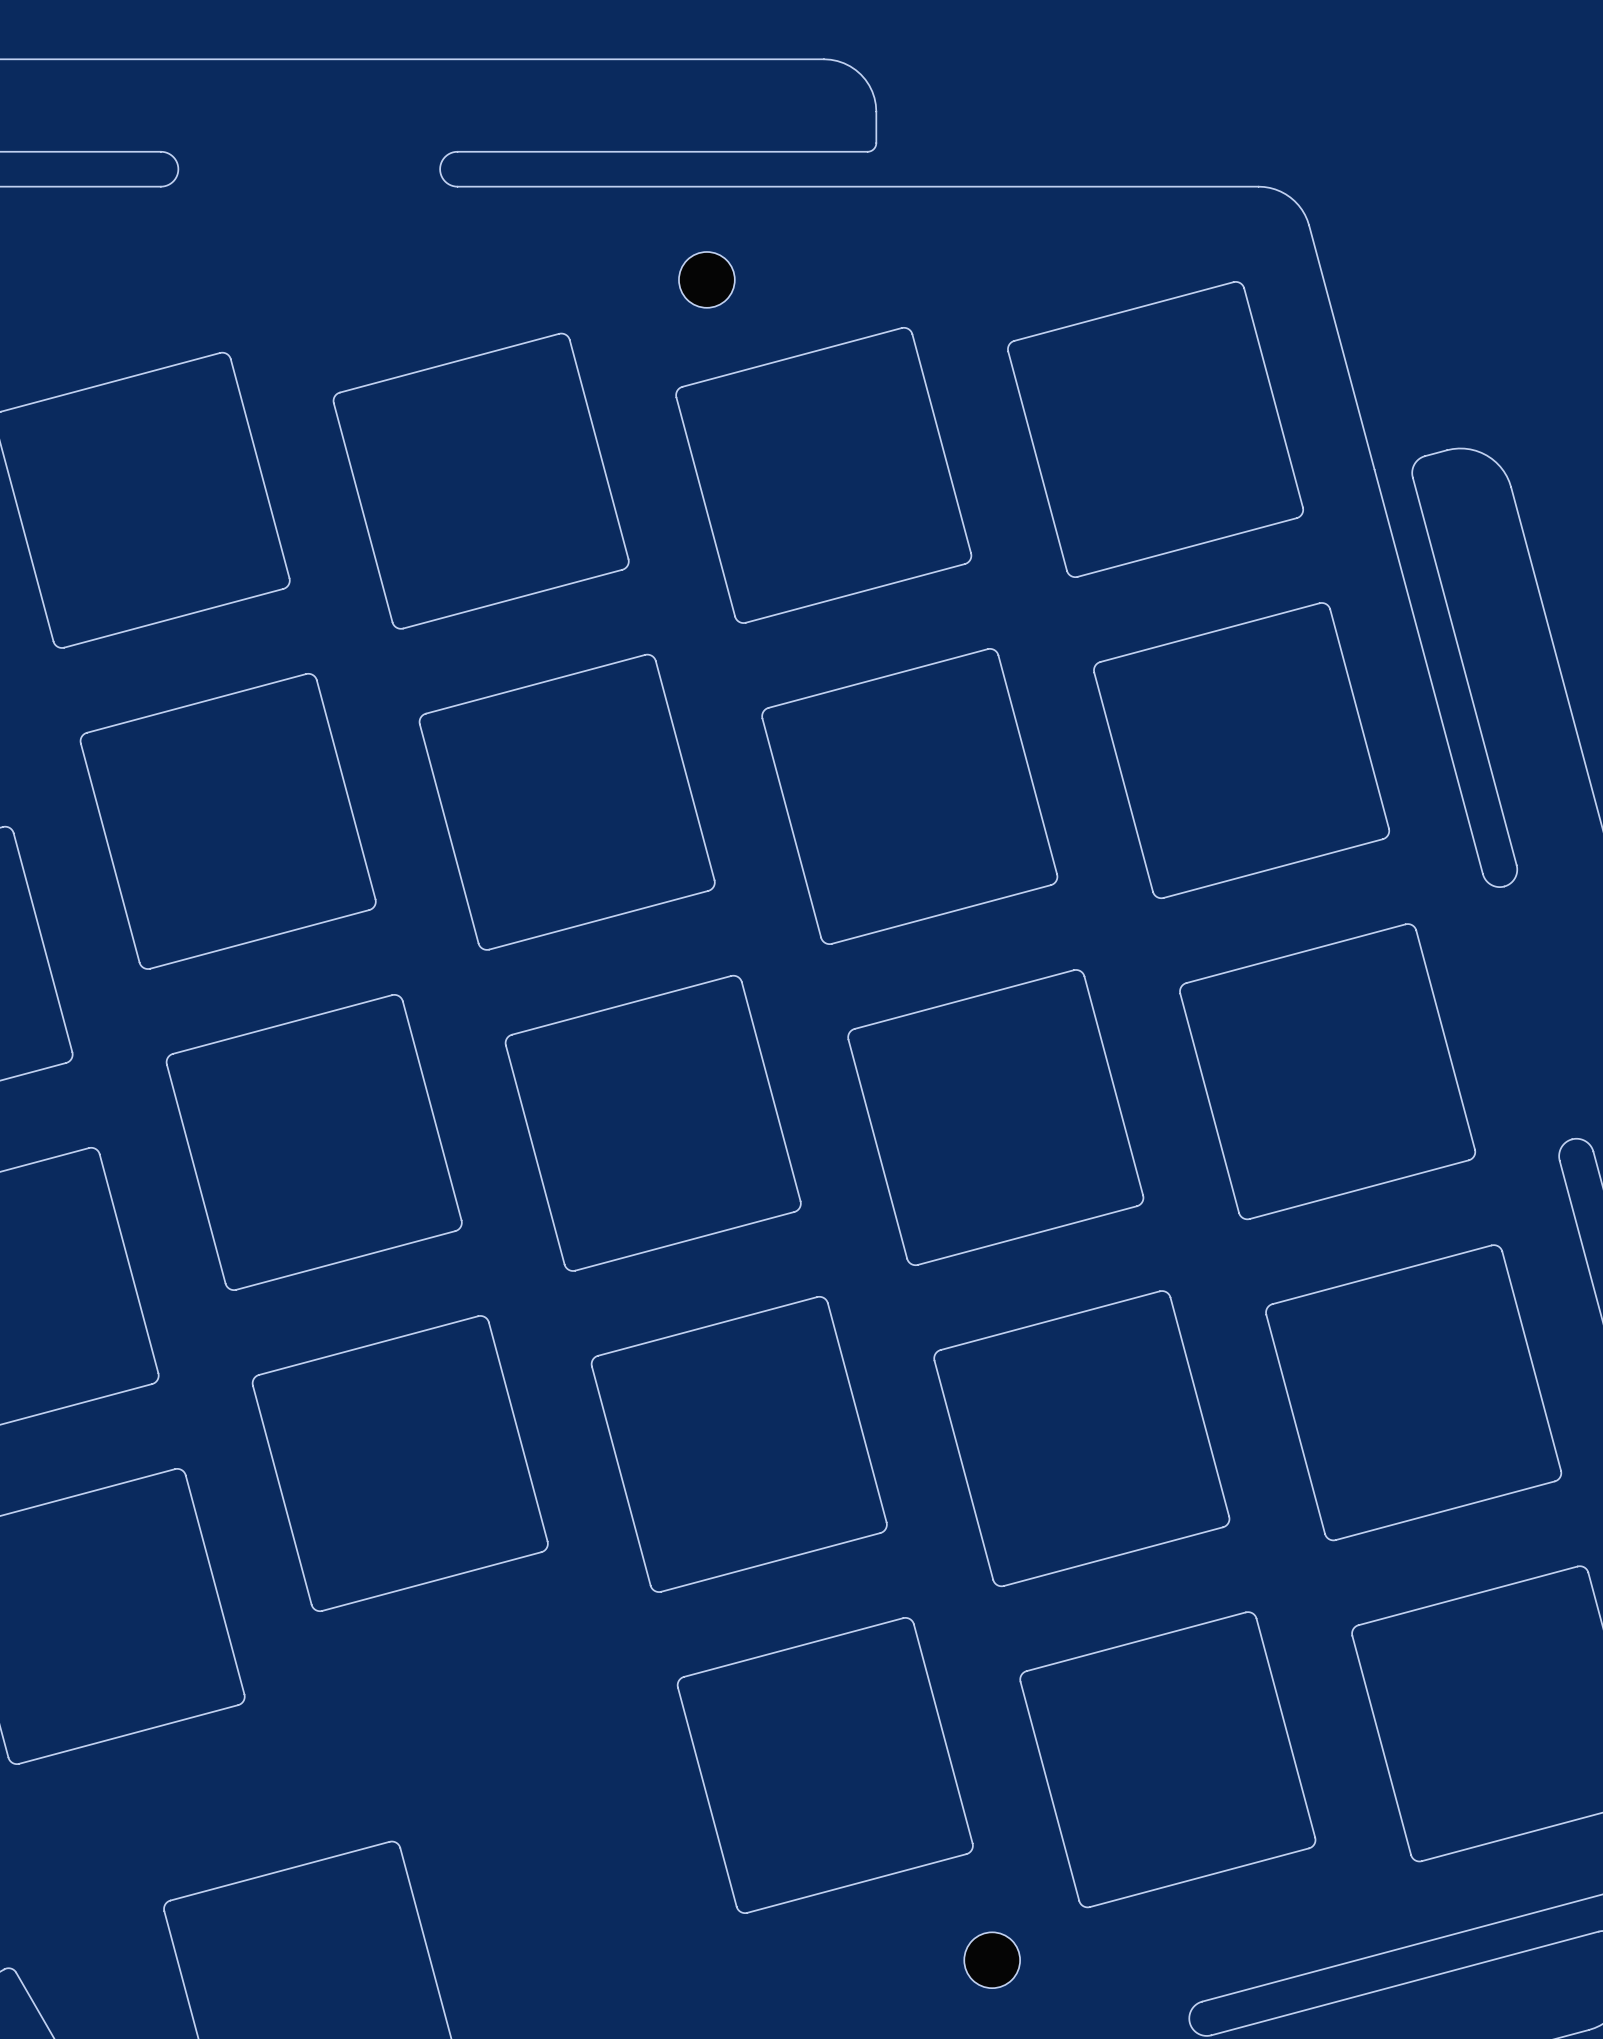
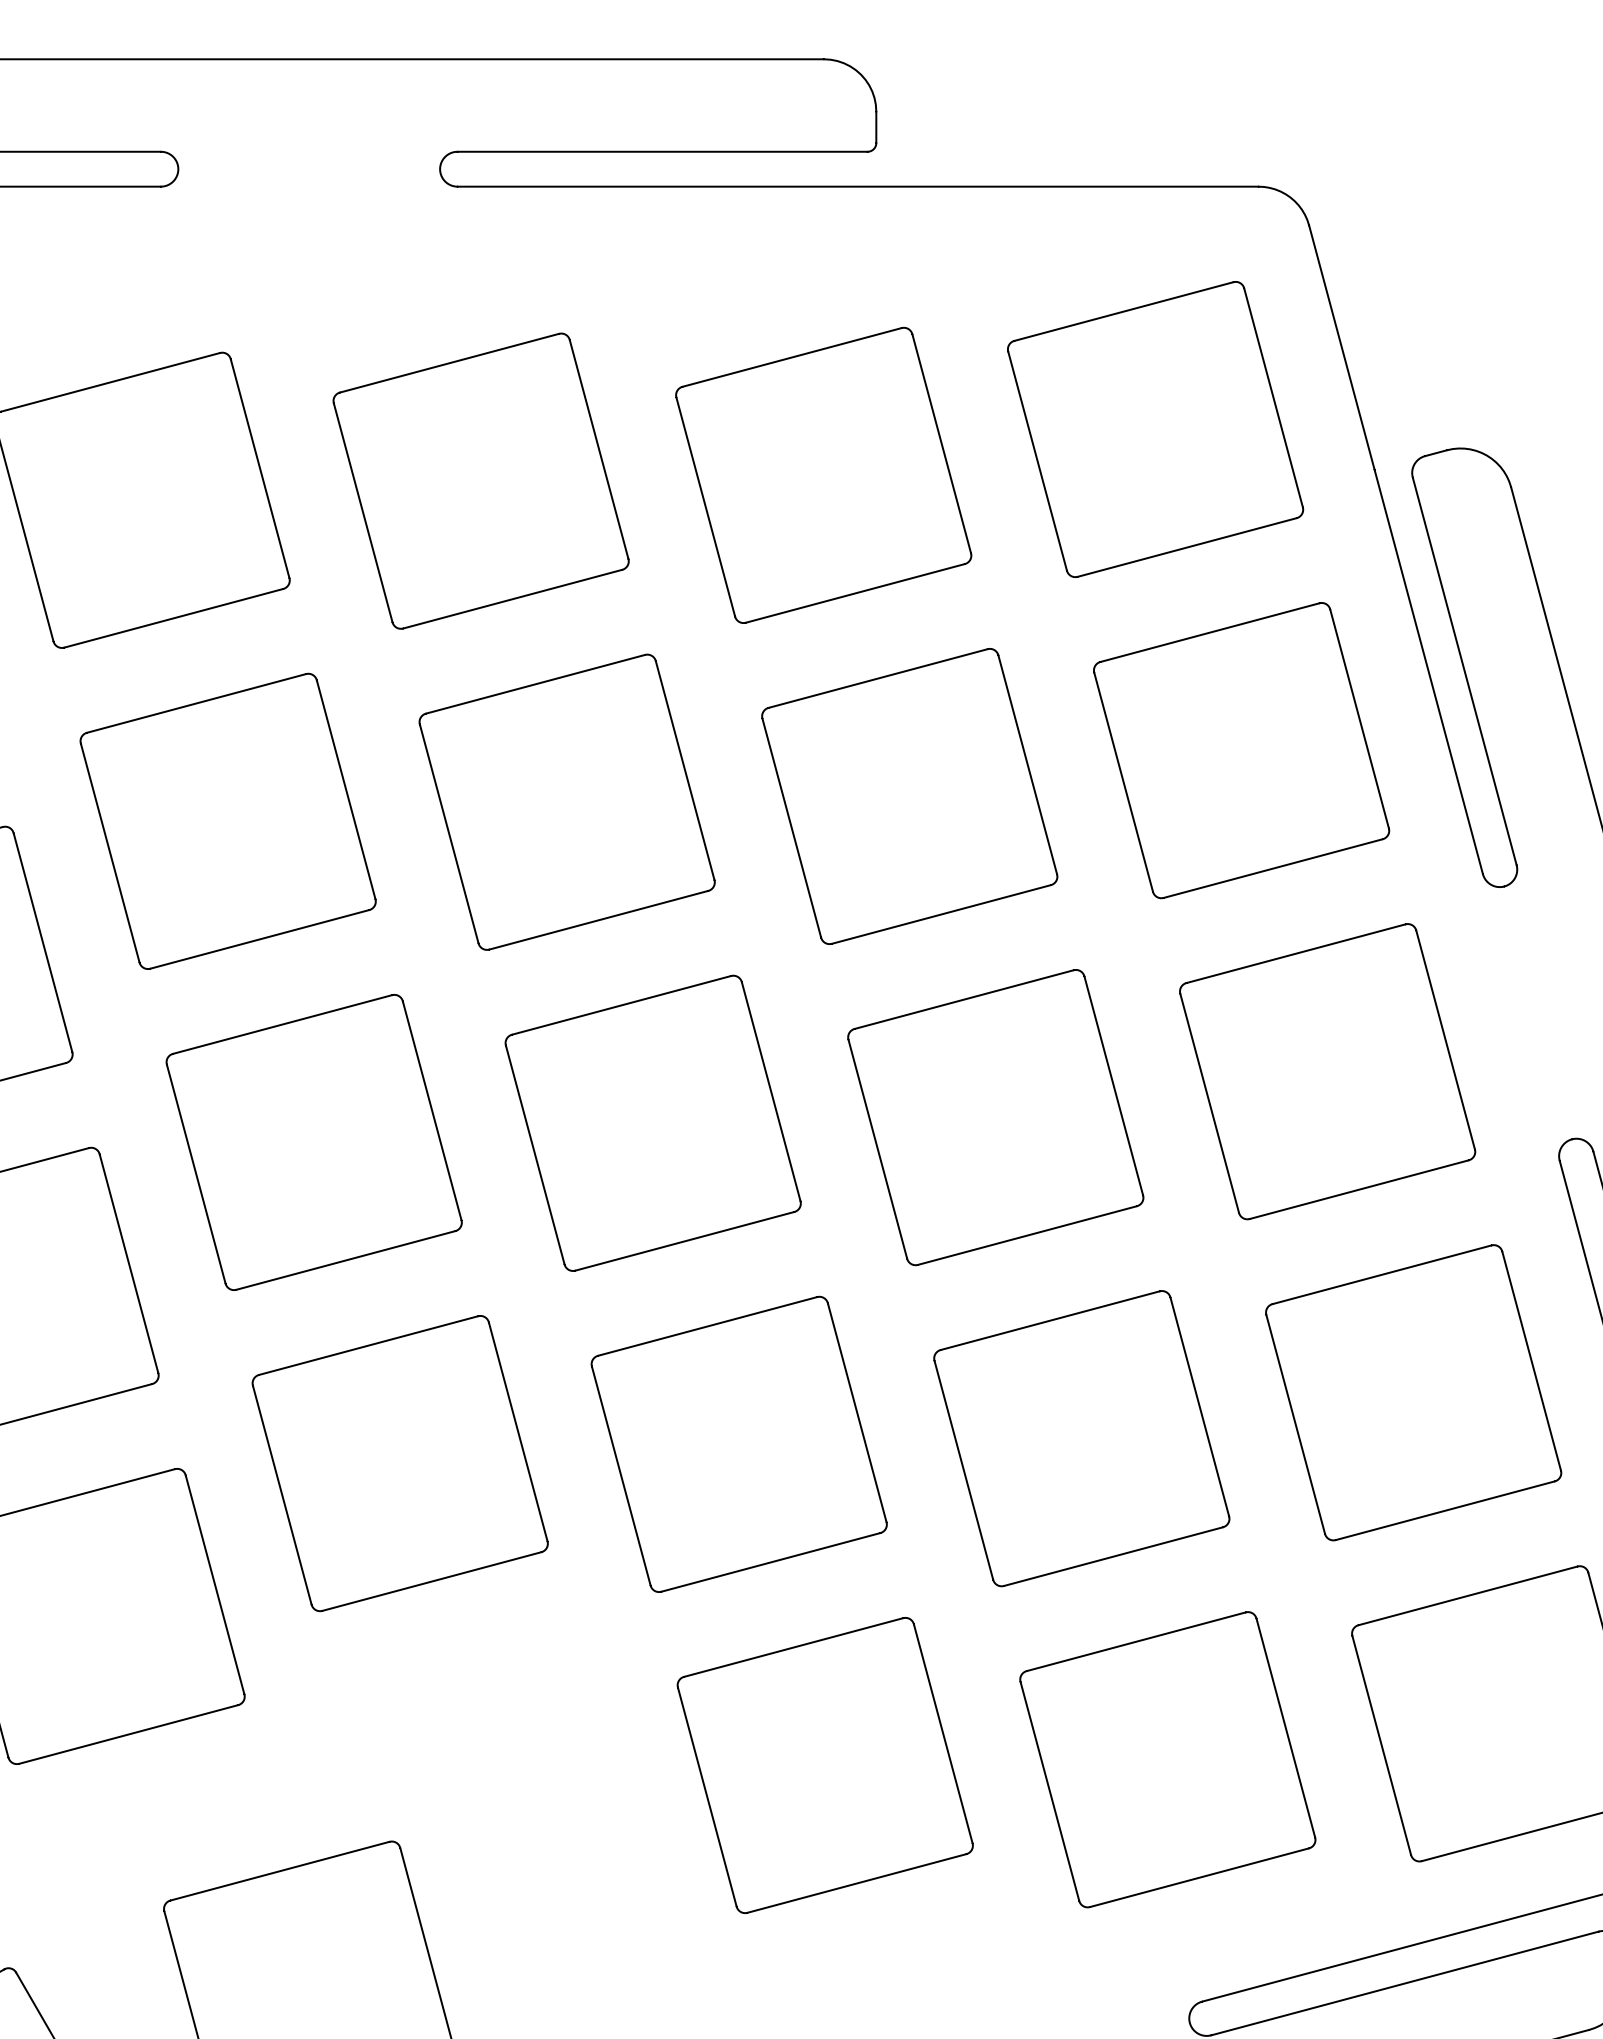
part: (706, 279) -> none
part: (992, 1960) -> none

